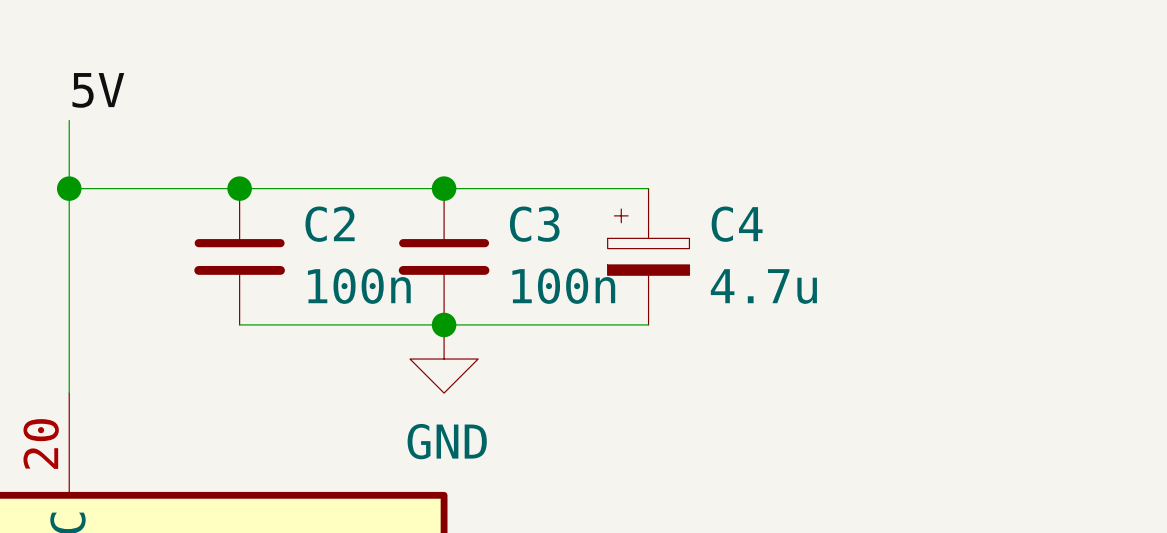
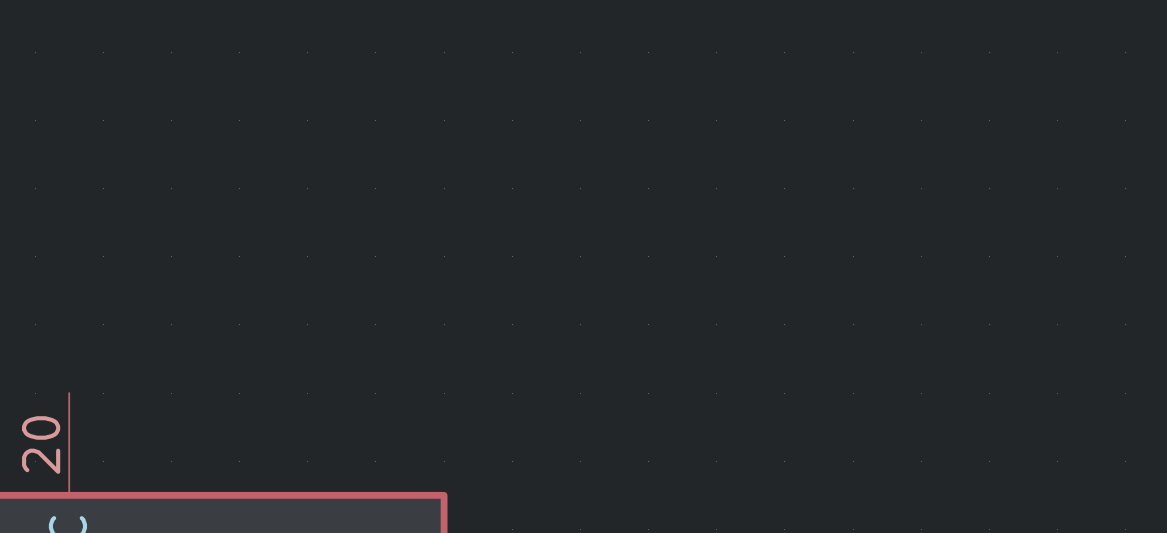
label: 5V (98, 90) -> none
wire: (69, 120) (69, 393) -> none
wire: (69, 188) (648, 188) -> none
junction: (69, 188) -> none
junction: (239, 188) -> none
junction: (444, 188) -> none
C2: 100n (239, 256) -> none
C3: 100n (444, 256) -> none
C4: 4.7u (648, 256) -> none
wire: (239, 324) (648, 324) -> none
junction: (444, 324) -> none
power symbol: GND (444, 359) -> none

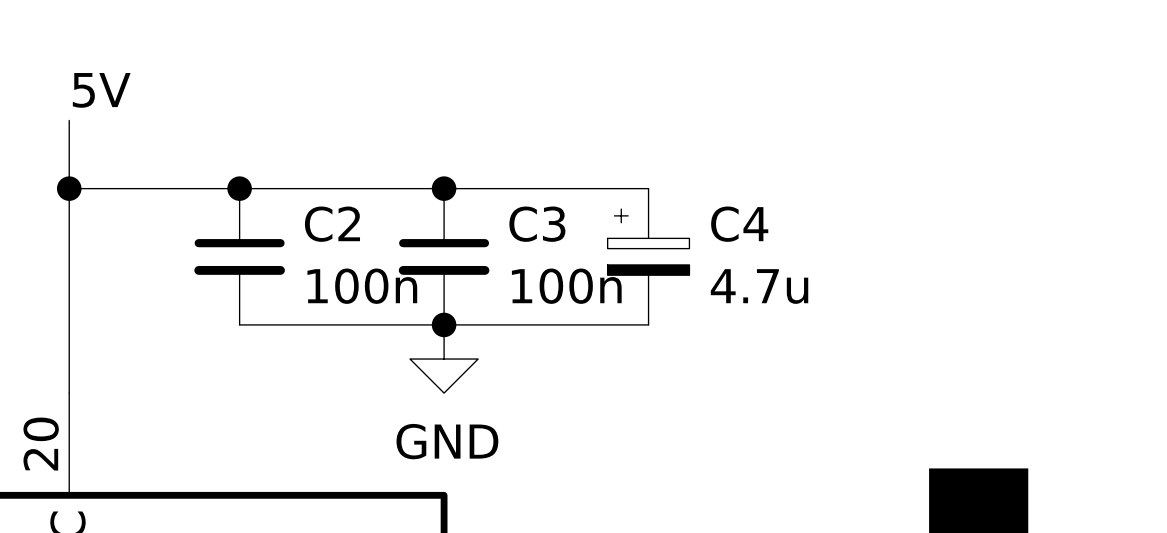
label: none -> 5V (101, 90)
wire: none -> (69, 120) (69, 393)
wire: none -> (69, 188) (648, 188)
junction: none -> (69, 188)
junction: none -> (239, 188)
junction: none -> (444, 188)
C2: none -> 100n (239, 256)
C3: none -> 100n (444, 256)
C4: none -> 4.7u (648, 256)
wire: none -> (239, 324) (648, 324)
junction: none -> (444, 324)
power symbol: none -> GND (444, 359)

